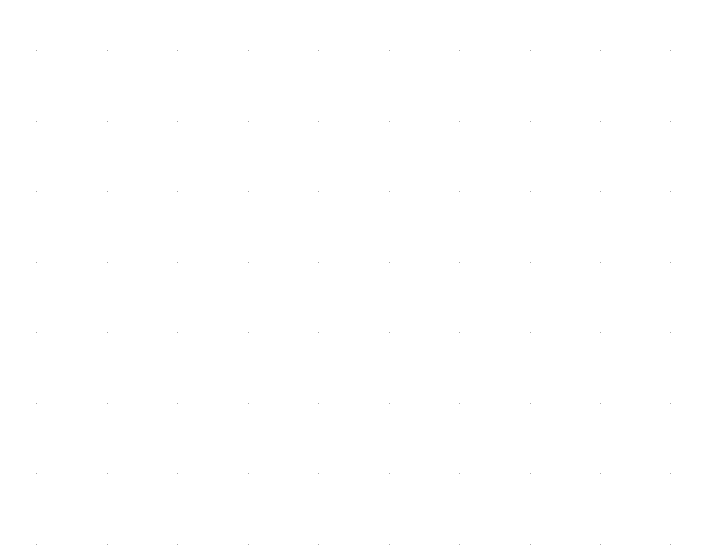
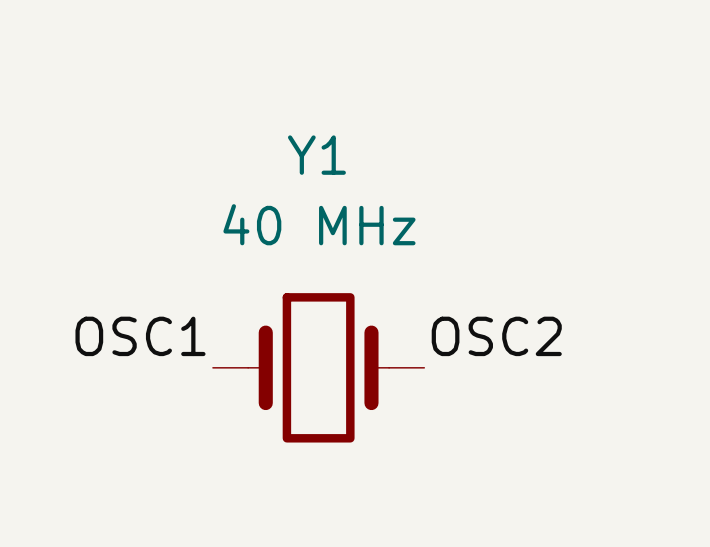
label: none -> OSC1 (140, 336)
label: none -> OSC2 (496, 336)
Y1: none -> 40 MHz (318, 367)

